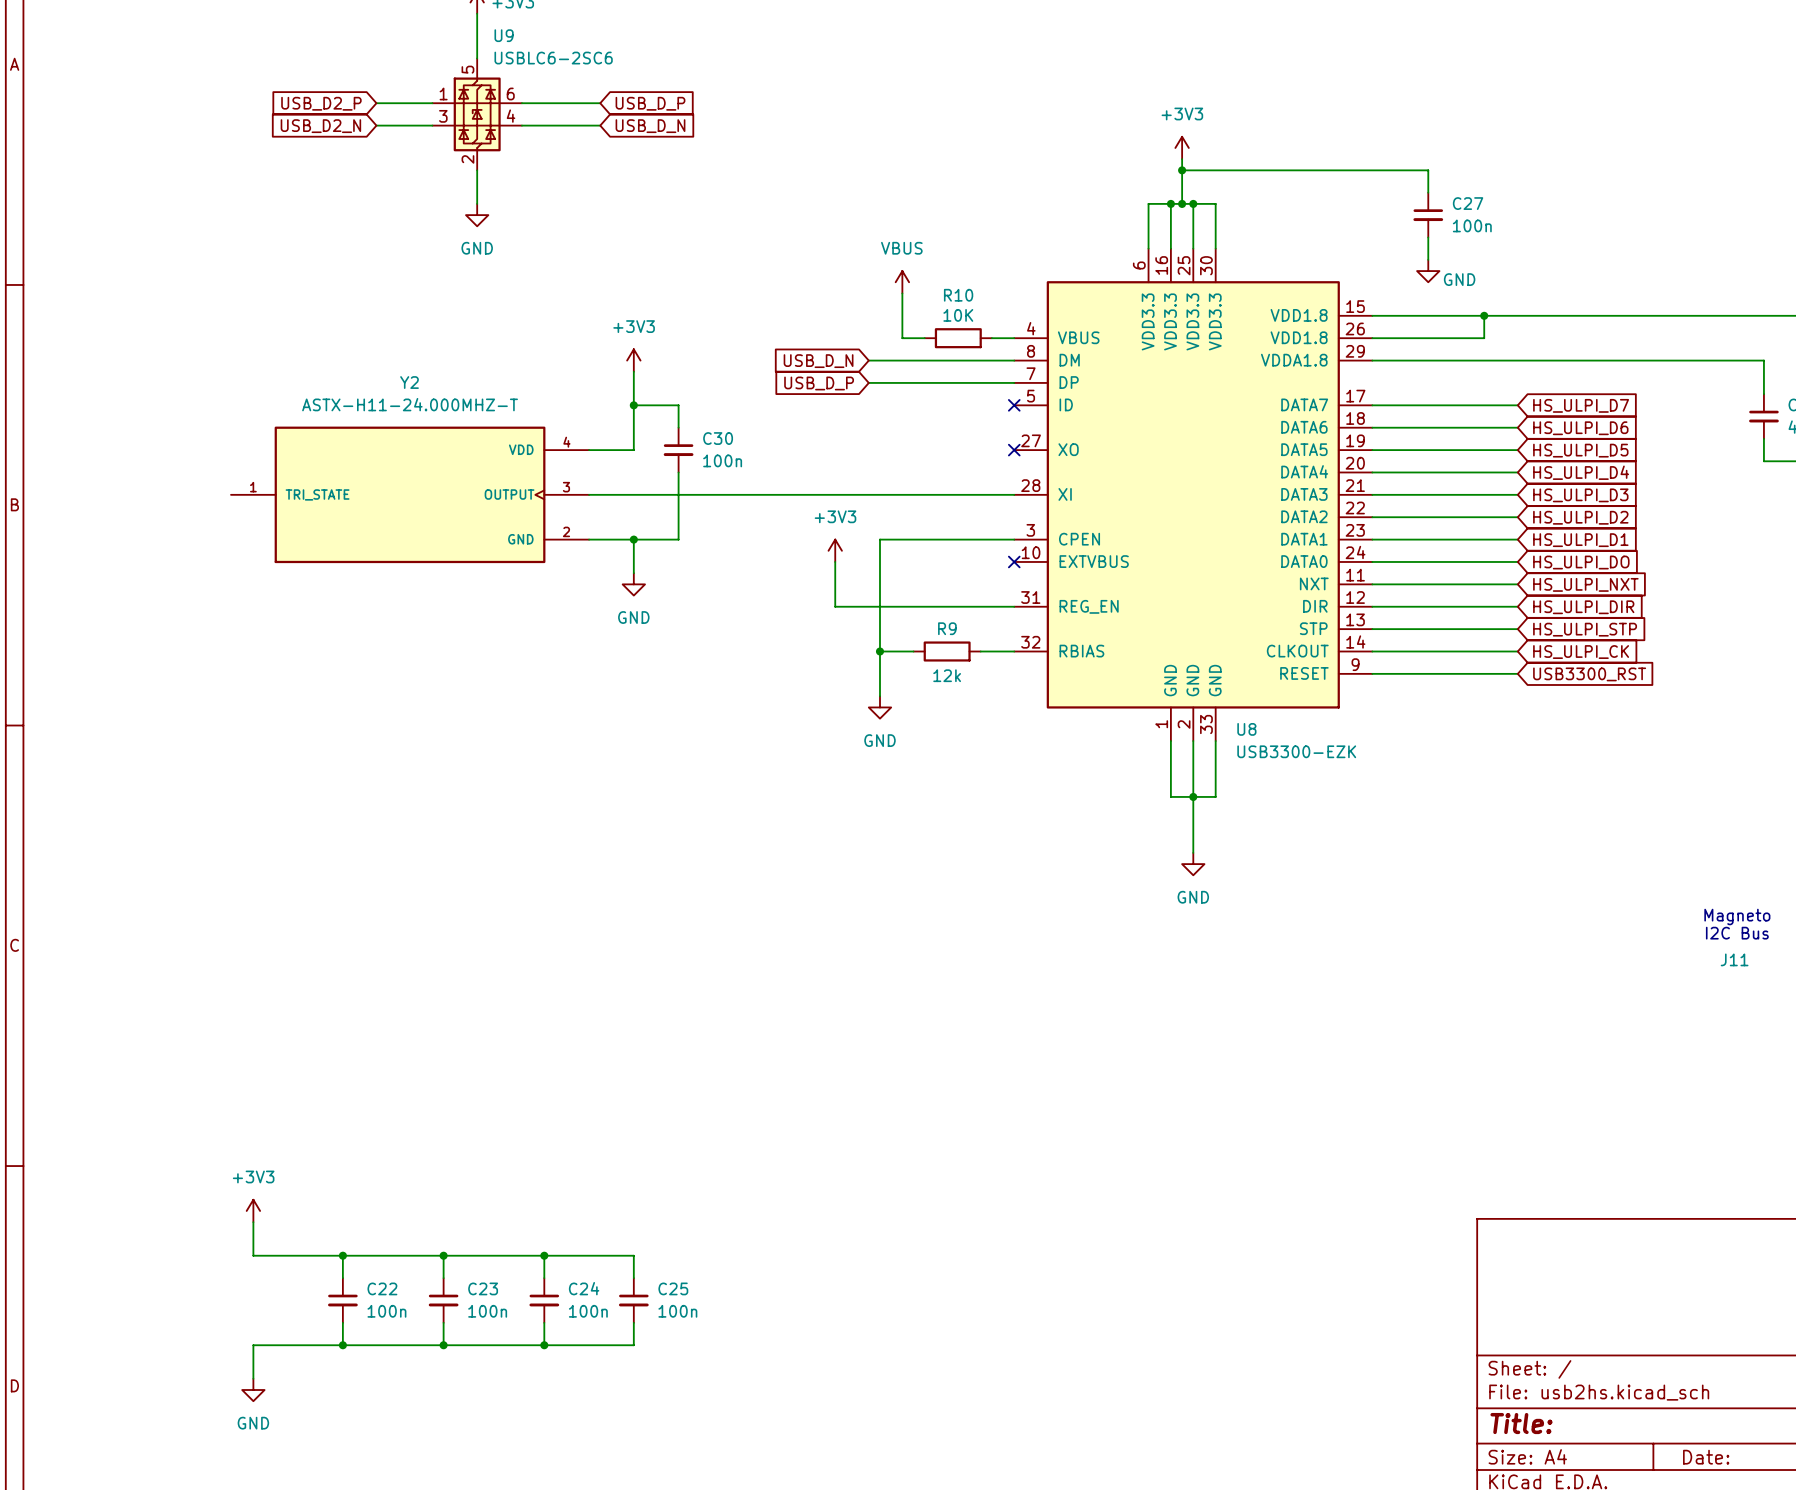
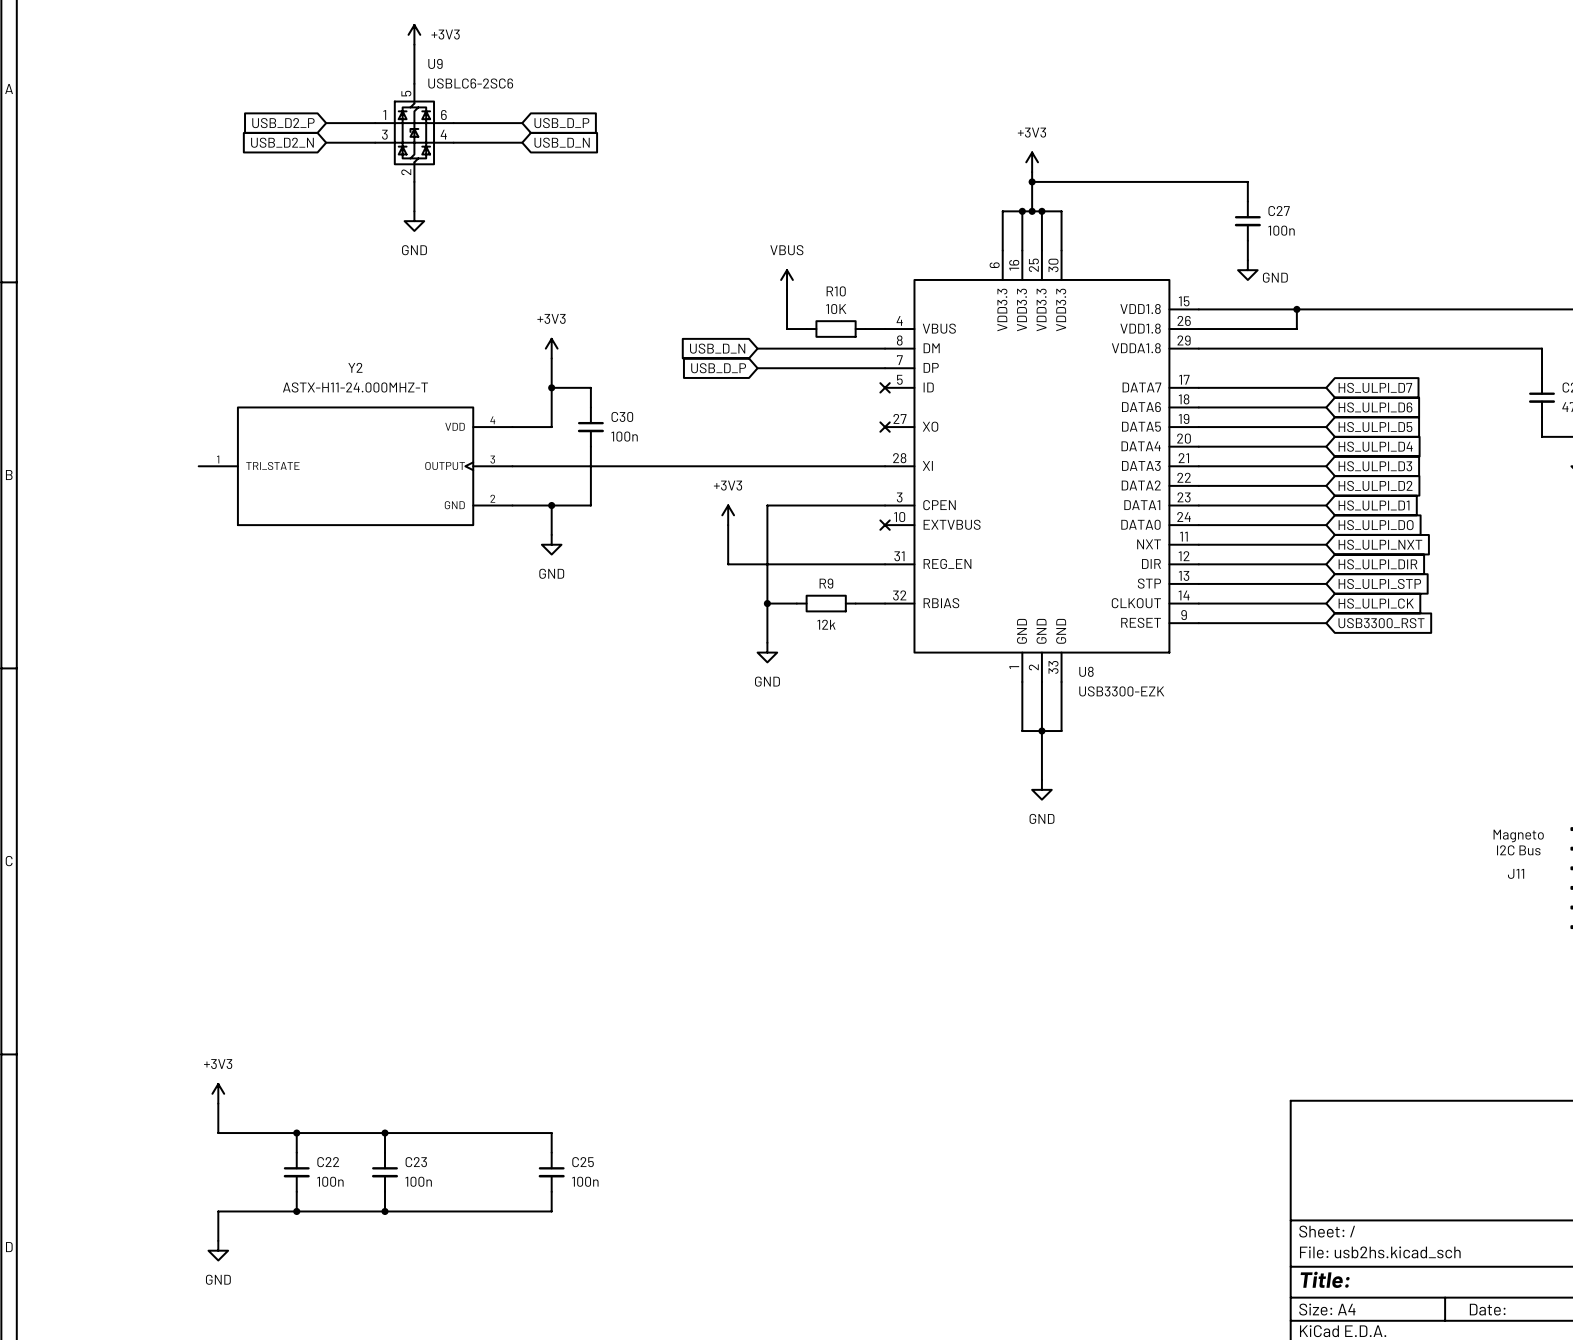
wire: (544, 1255) (544, 1278) -> none
junction: (544, 1255) -> none
C24: 100n (544, 1300) -> none
wire: (544, 1322) (544, 1345) -> none
junction: (544, 1345) -> none

